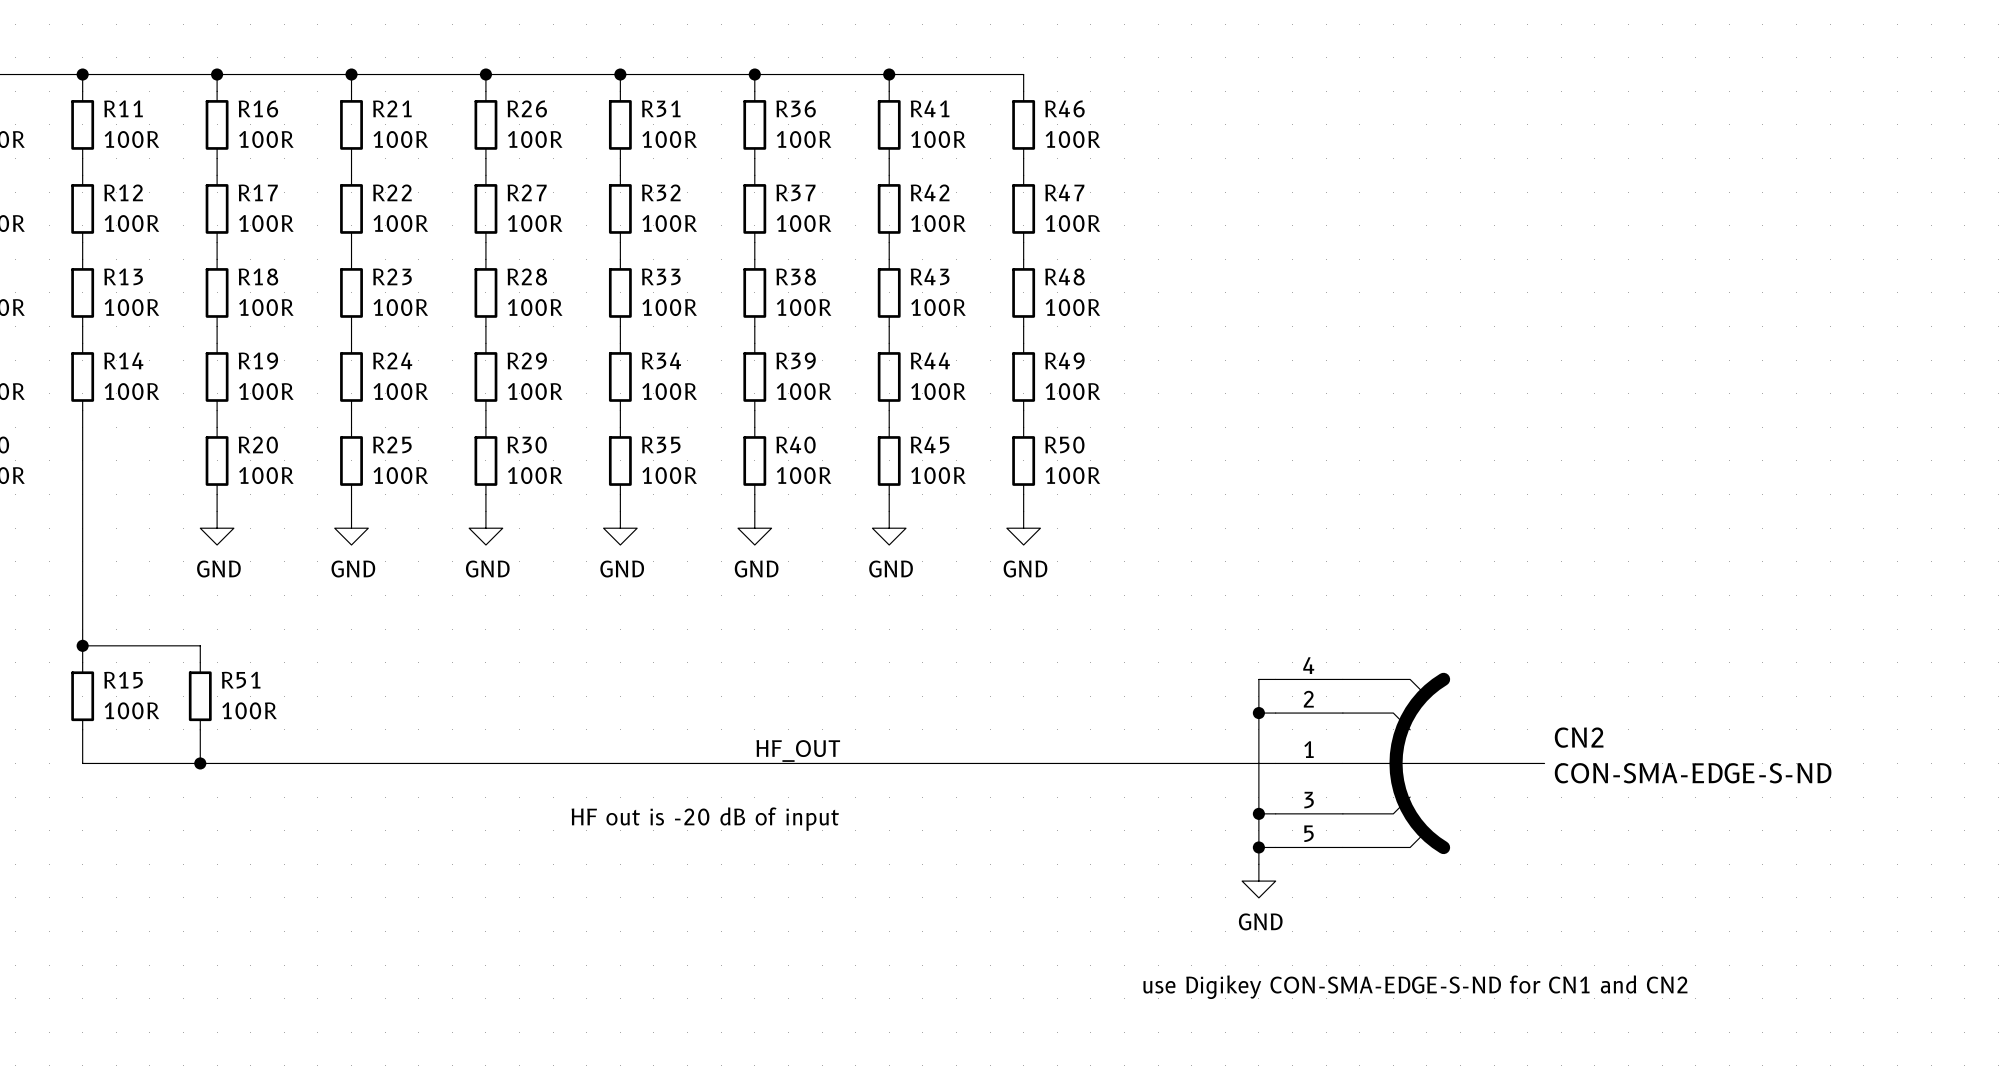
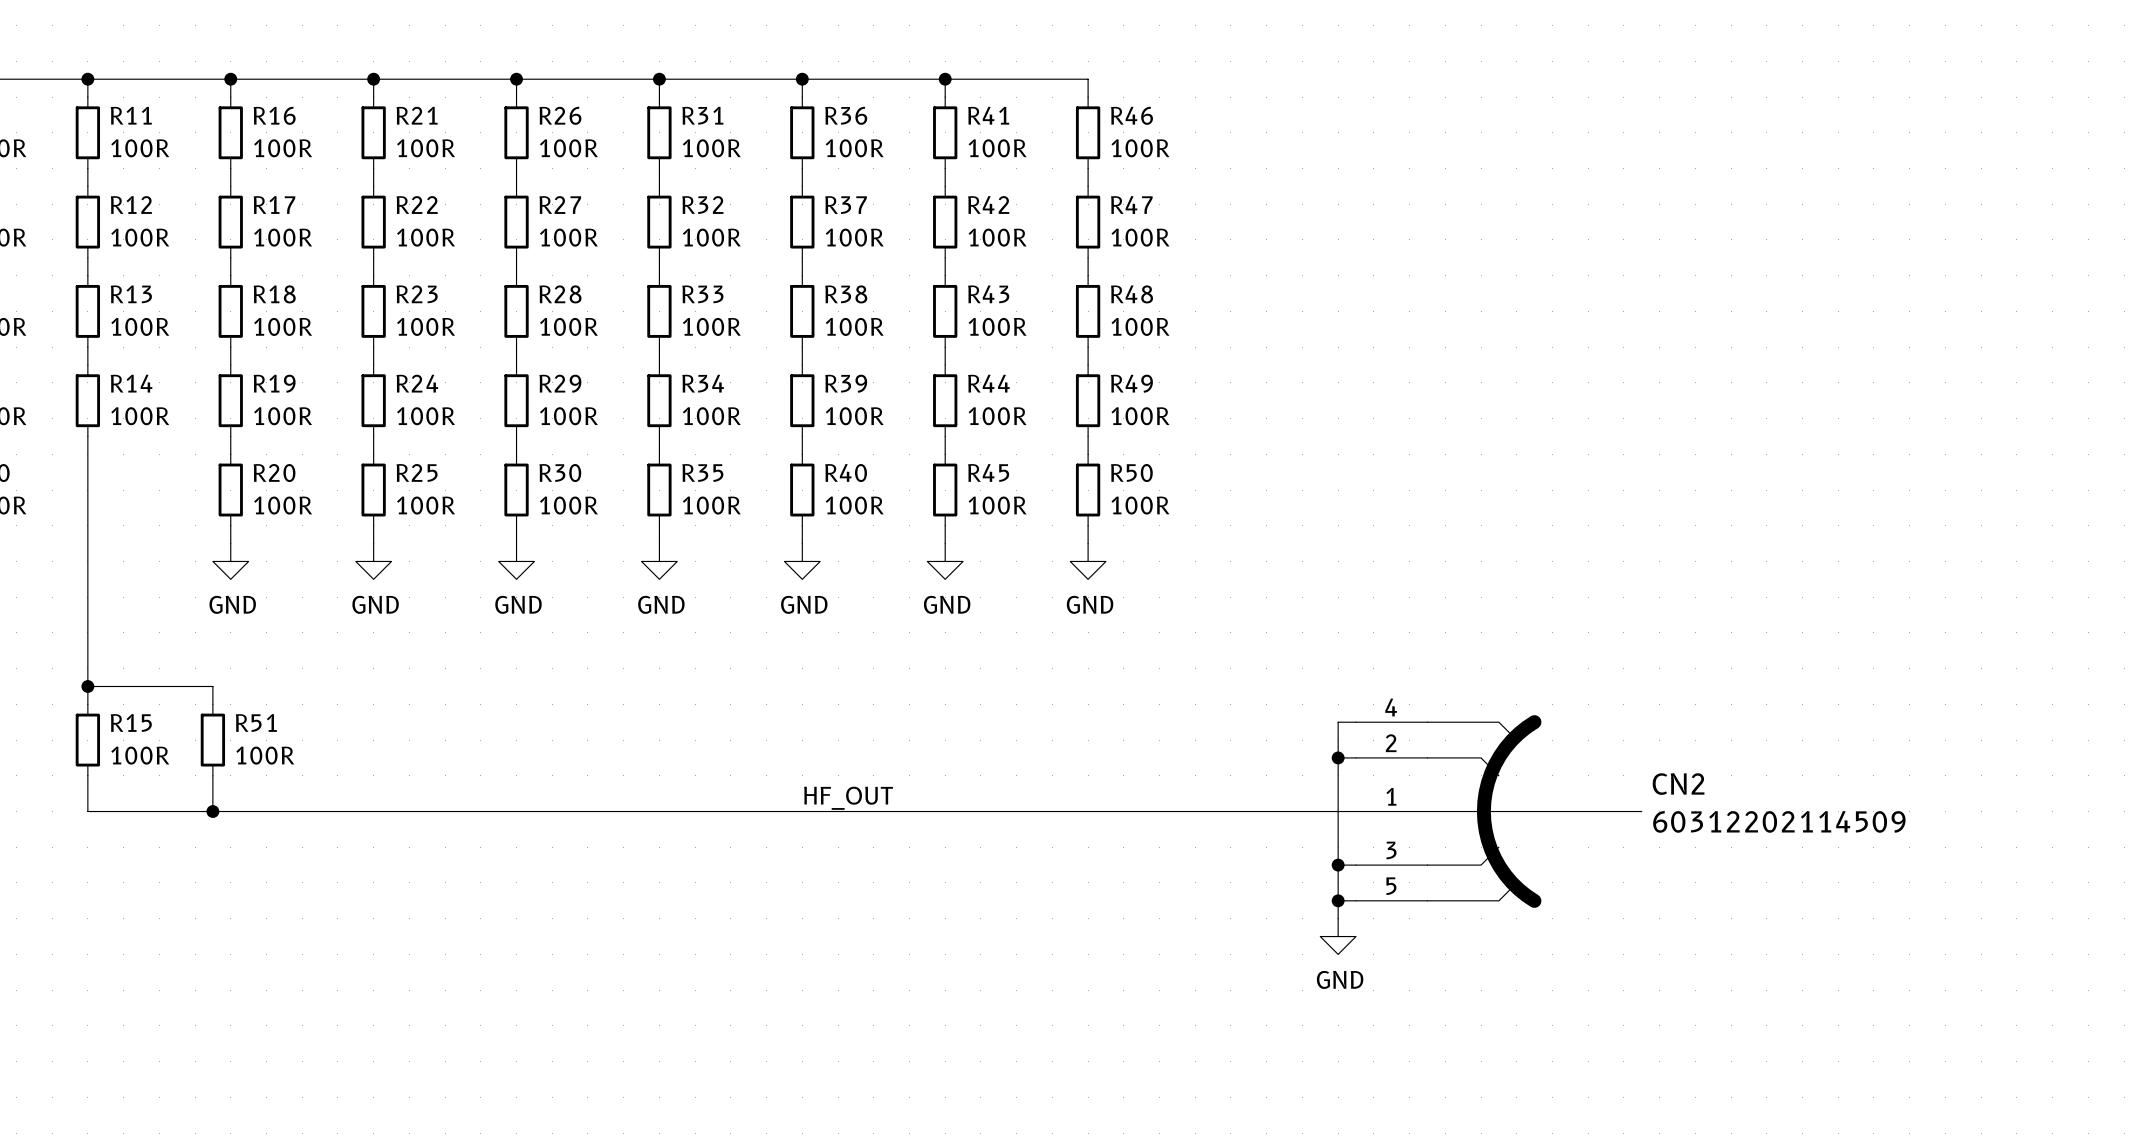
CN2 value: CON-SMA-EDGE-S-ND (1693, 773) -> 60312202114509 (1779, 821)
text: HF out is -20 dB of input (705, 819) -> none
text: use Digikey CON-SMA-EDGE-S-ND for CN1 and CN2 (1415, 987) -> none

